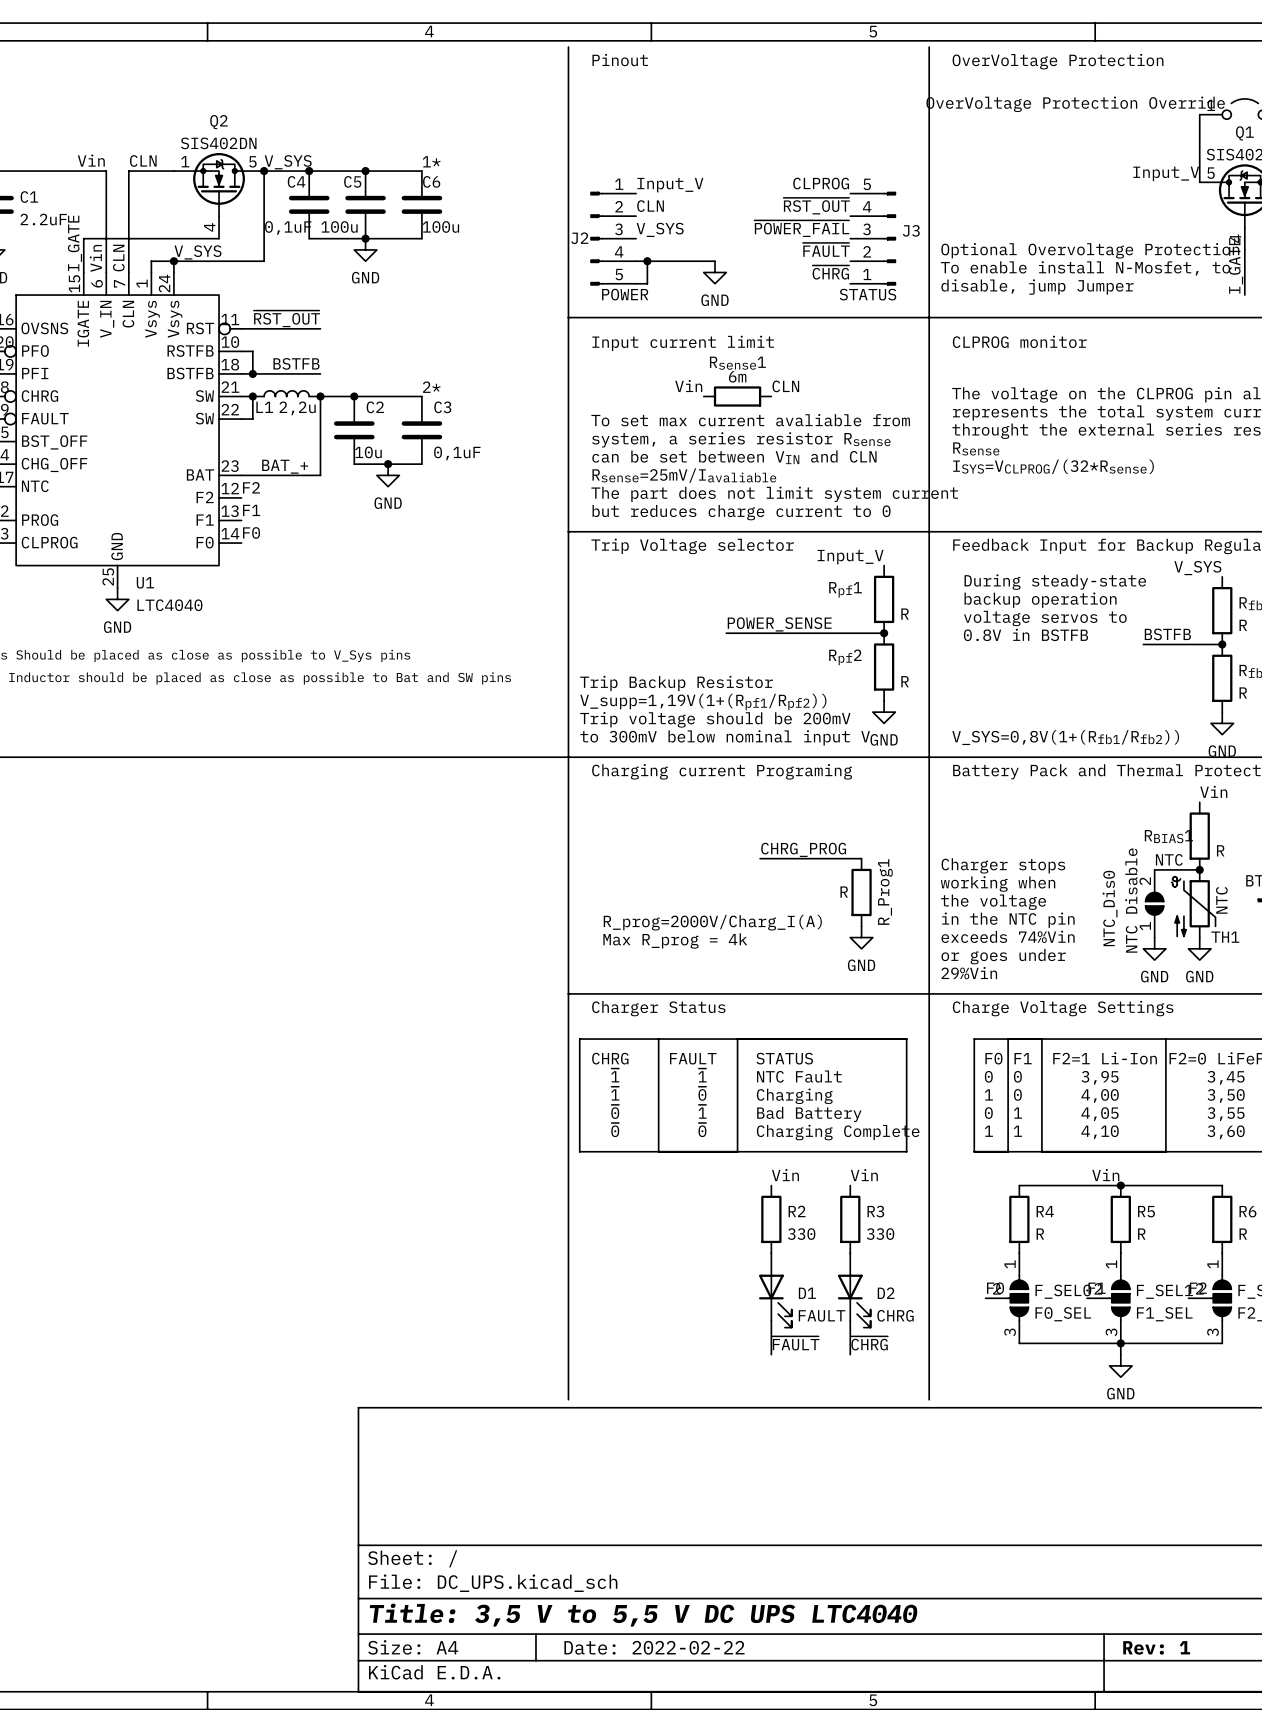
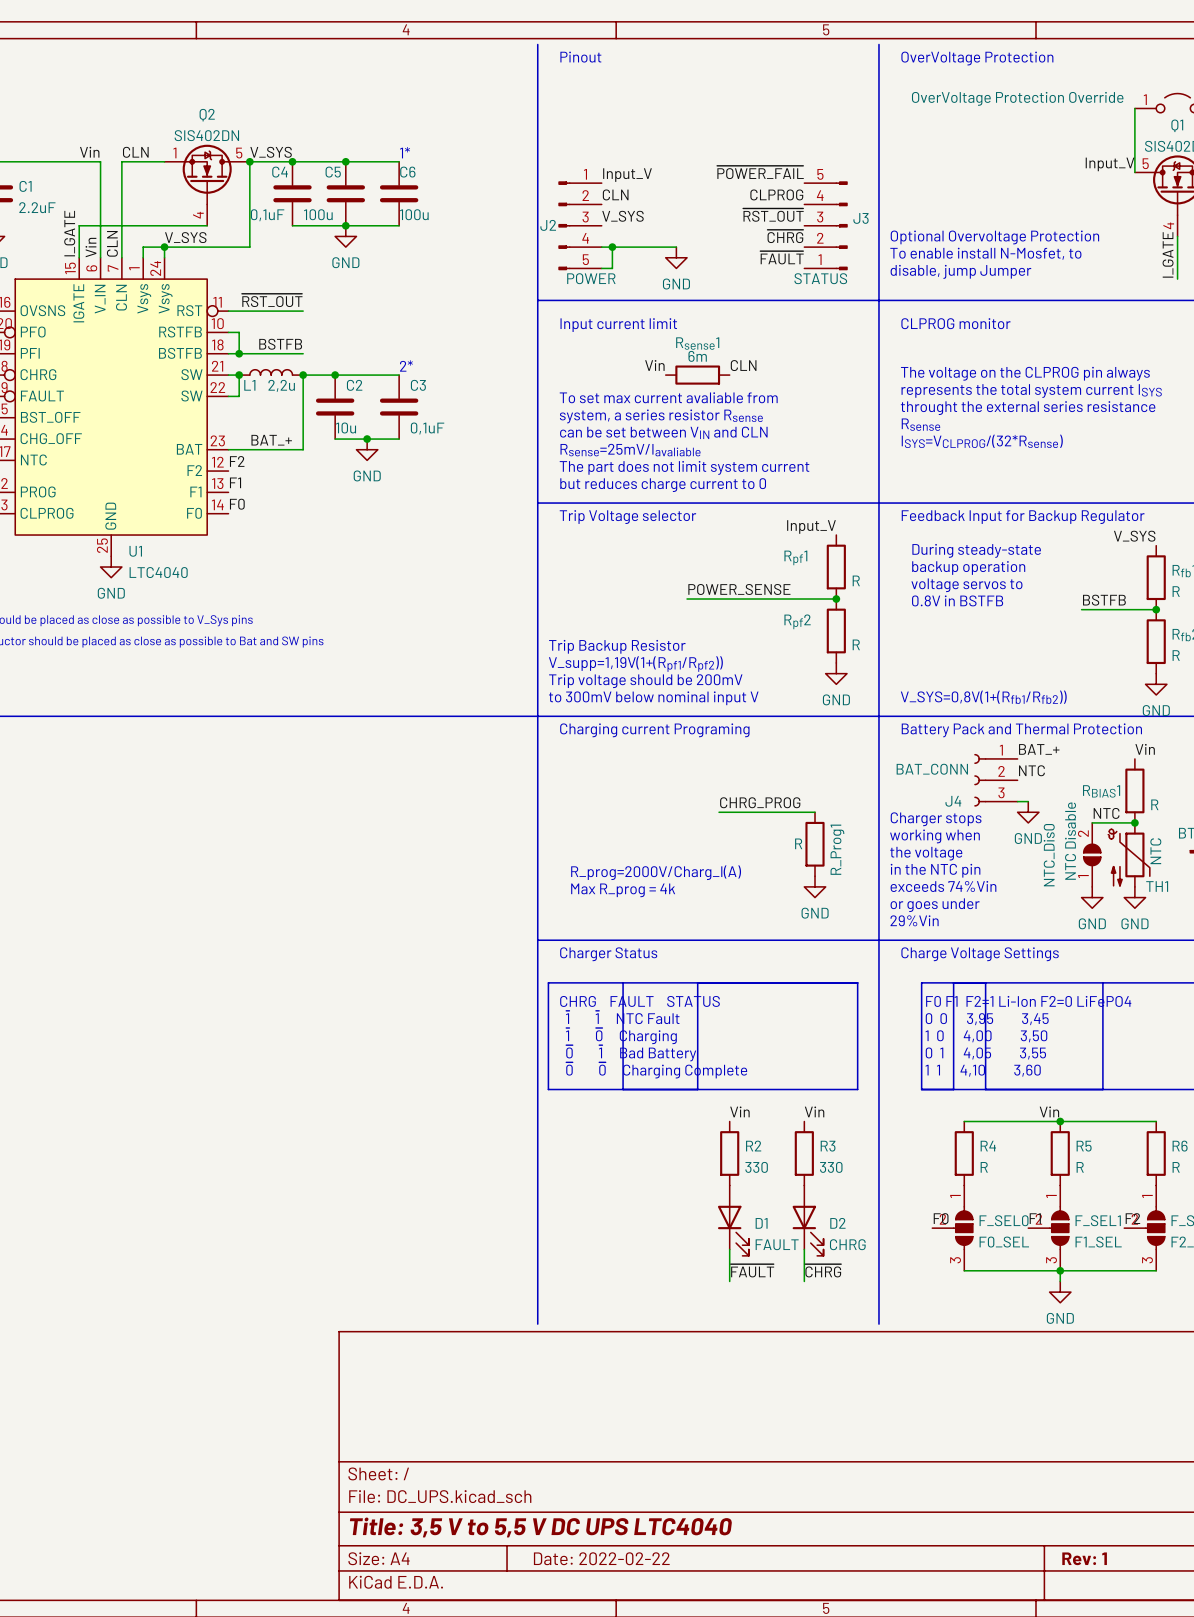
label: CLPROG (821, 183) -> ~{POWER_FAIL} (760, 172)
label: ~{RST_OUT} (816, 206) -> CLPROG (776, 194)
label: ~{POWER_FAIL} (801, 228) -> ~{RST_OUT} (773, 215)
label: ~{FAULT} (826, 249) -> ~{CHRG} (785, 236)
label: ~{CHRG} (830, 272) -> ~{FAULT} (782, 257)
label: none -> BAT_+ (1039, 749)
label: none -> NTC (1031, 770)
J4: none -> BAT_CONN (995, 780)
wire: none -> (1017, 801) (1028, 801)
power symbol: none -> GND (1028, 812)

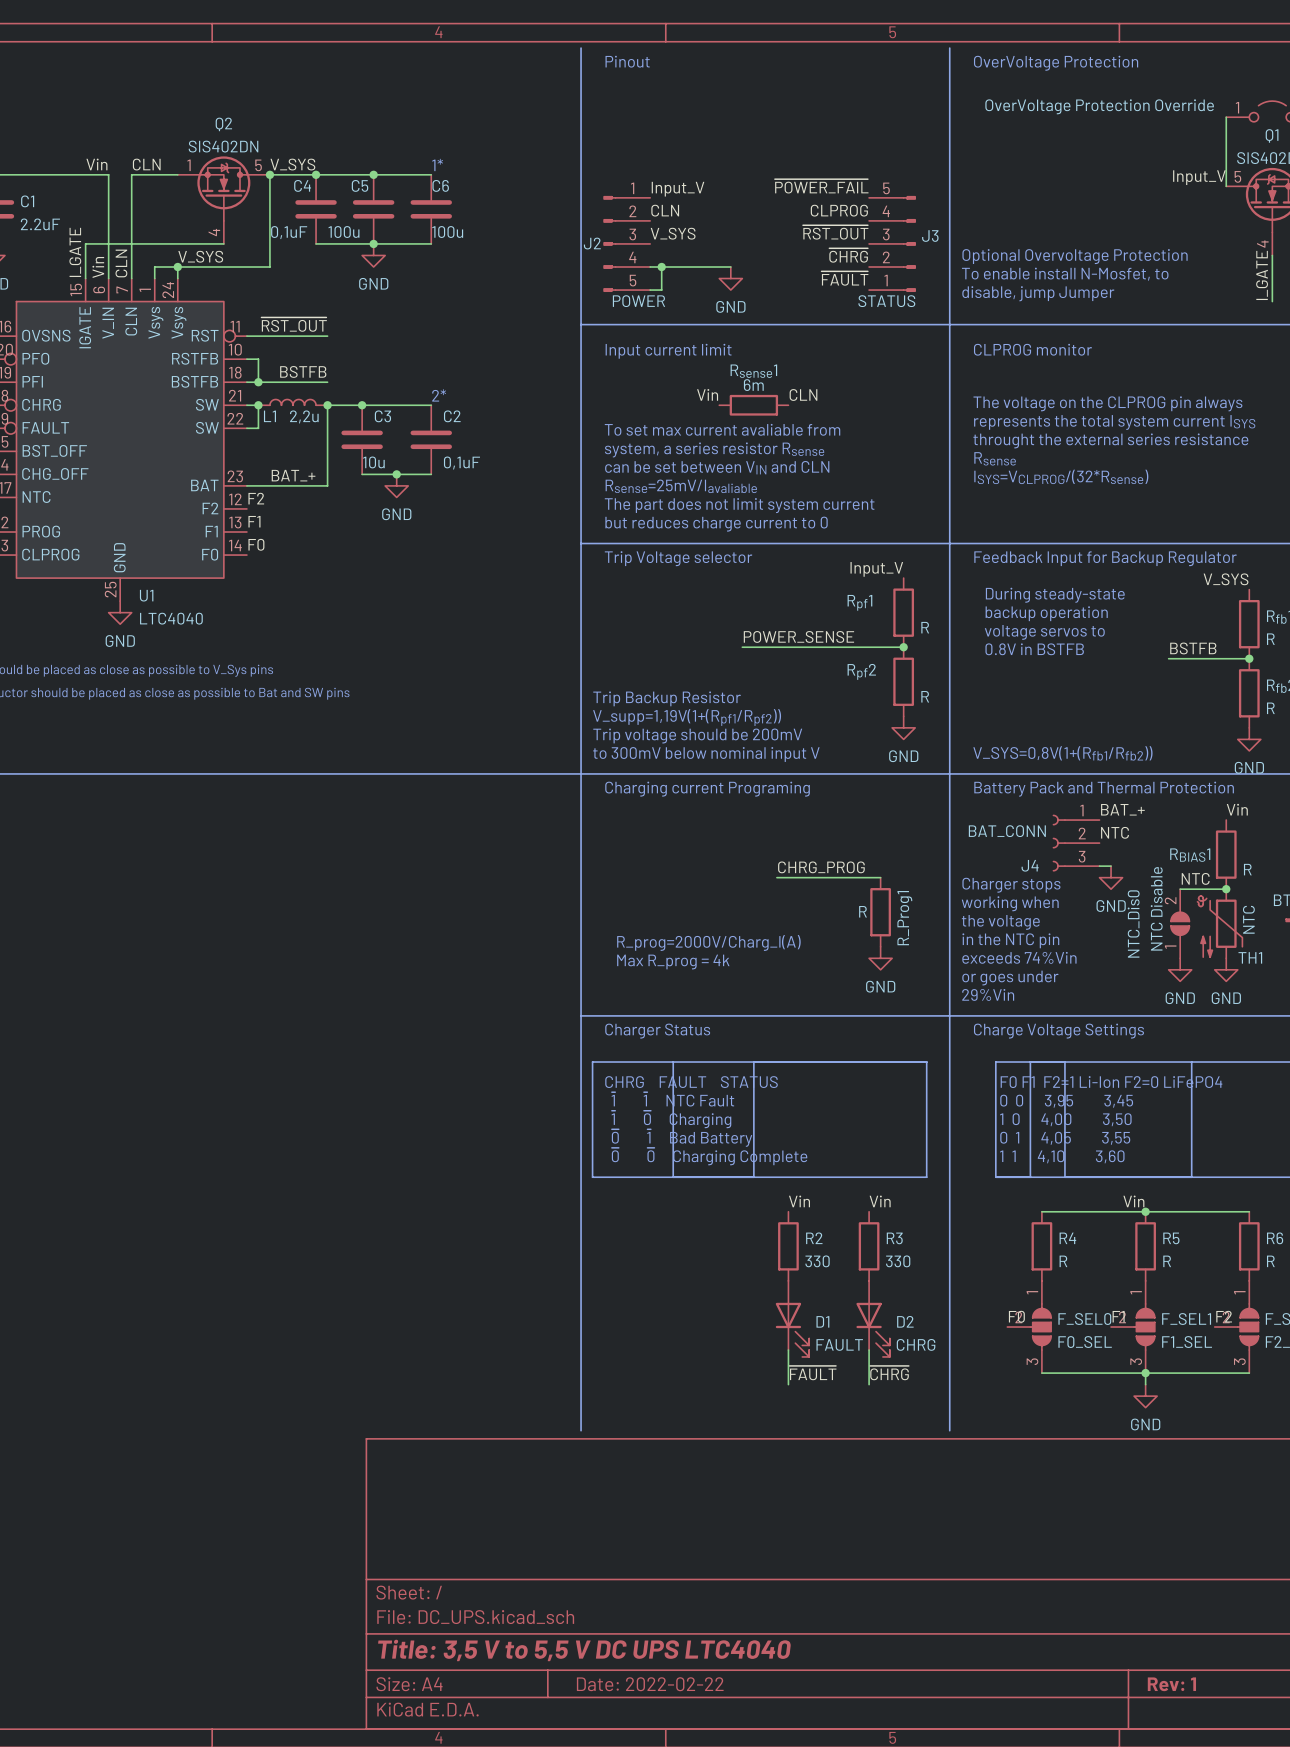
C2 name: C2 (354, 385) -> C3 (382, 416)
C3 name: C3 (418, 385) -> C2 (452, 416)

